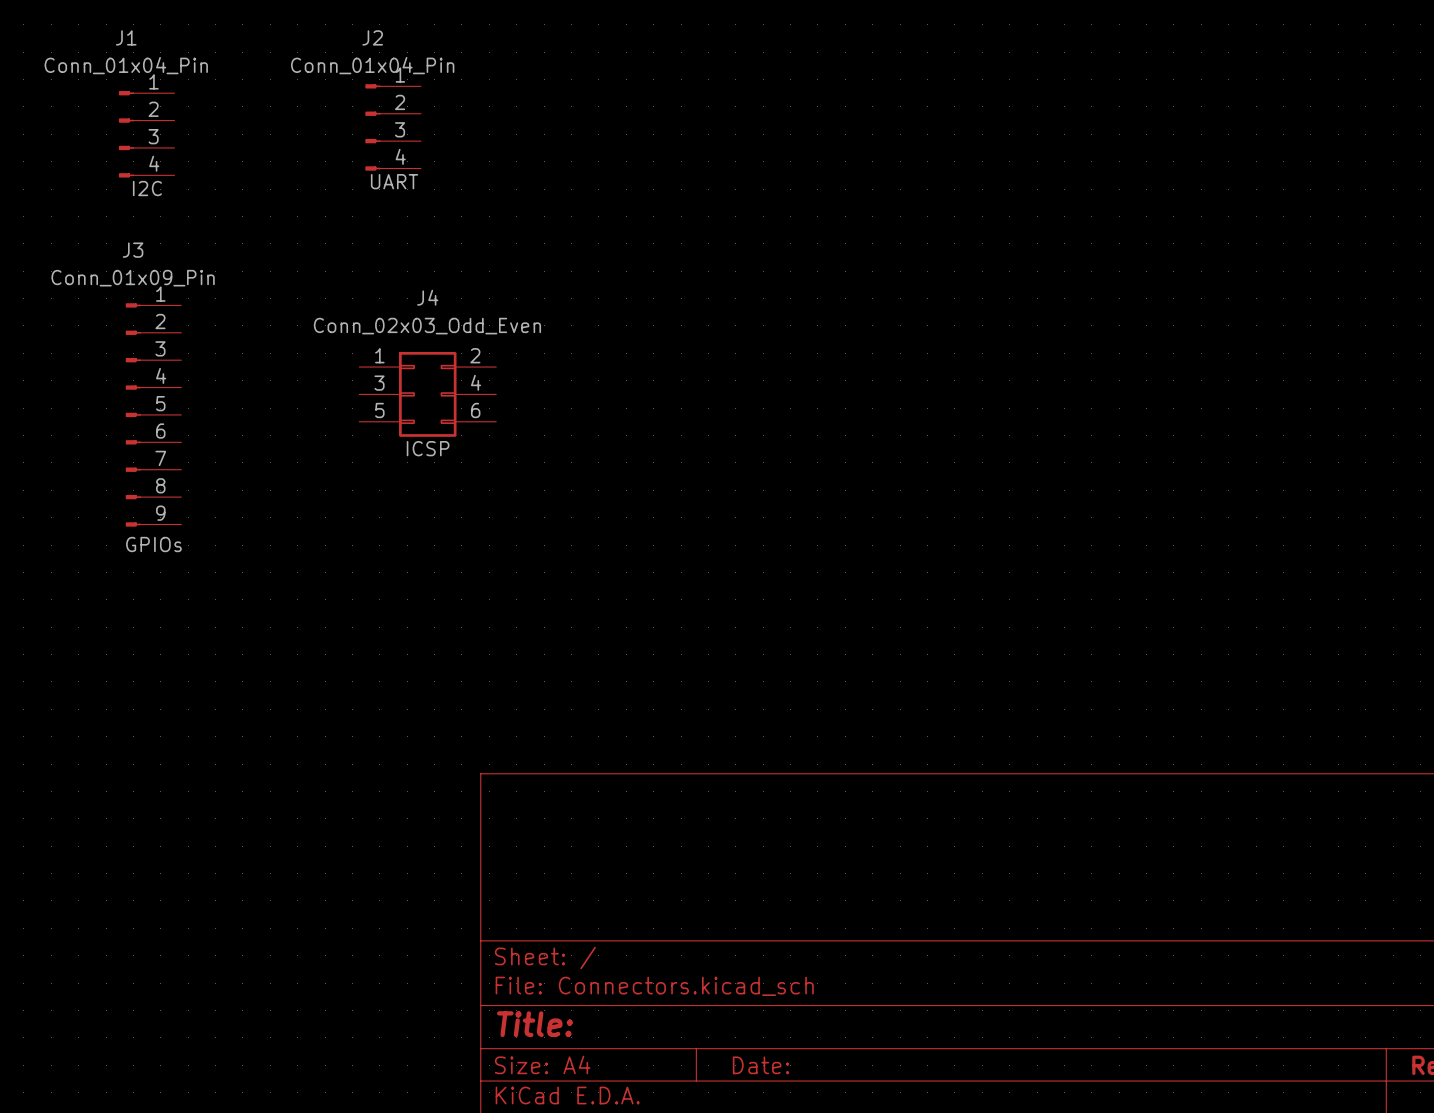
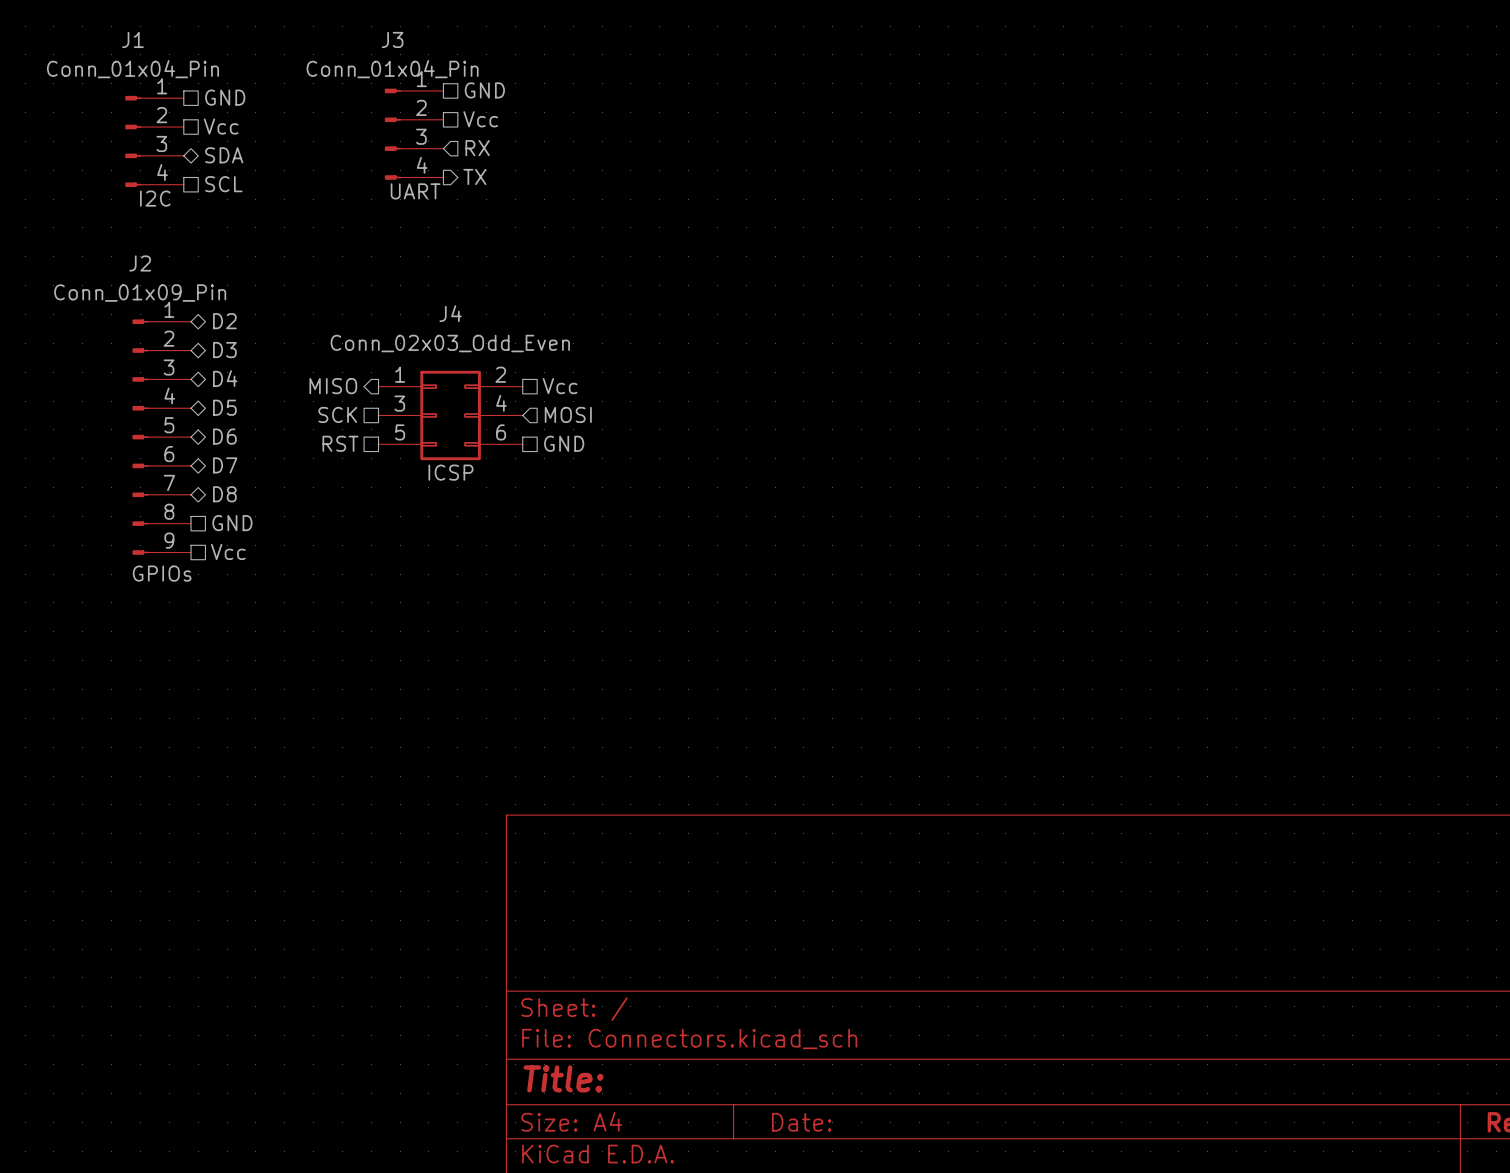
J2 name: J2 (372, 37) -> J3 (392, 39)
hierarchical label: none -> GND (484, 90)
hierarchical label: none -> GND (225, 97)
hierarchical label: none -> Vcc (480, 119)
hierarchical label: none -> Vcc (221, 126)
hierarchical label: none -> RX (477, 148)
hierarchical label: none -> SDA (224, 155)
hierarchical label: none -> TX (474, 176)
hierarchical label: none -> SCL (223, 184)
J3 name: J3 (133, 250) -> J2 (140, 263)
hierarchical label: none -> D2 (224, 321)
hierarchical label: none -> D3 (224, 350)
hierarchical label: none -> D4 (225, 378)
hierarchical label: none -> MISO (333, 386)
hierarchical label: none -> Vcc (560, 386)
hierarchical label: none -> D5 (224, 407)
hierarchical label: none -> SCK (337, 414)
hierarchical label: none -> MOSI (568, 414)
hierarchical label: none -> D6 (224, 436)
hierarchical label: none -> RST (340, 443)
hierarchical label: none -> GND (564, 443)
hierarchical label: none -> D7 (225, 465)
hierarchical label: none -> D8 (224, 494)
hierarchical label: none -> GND (232, 523)
hierarchical label: none -> Vcc (228, 551)

